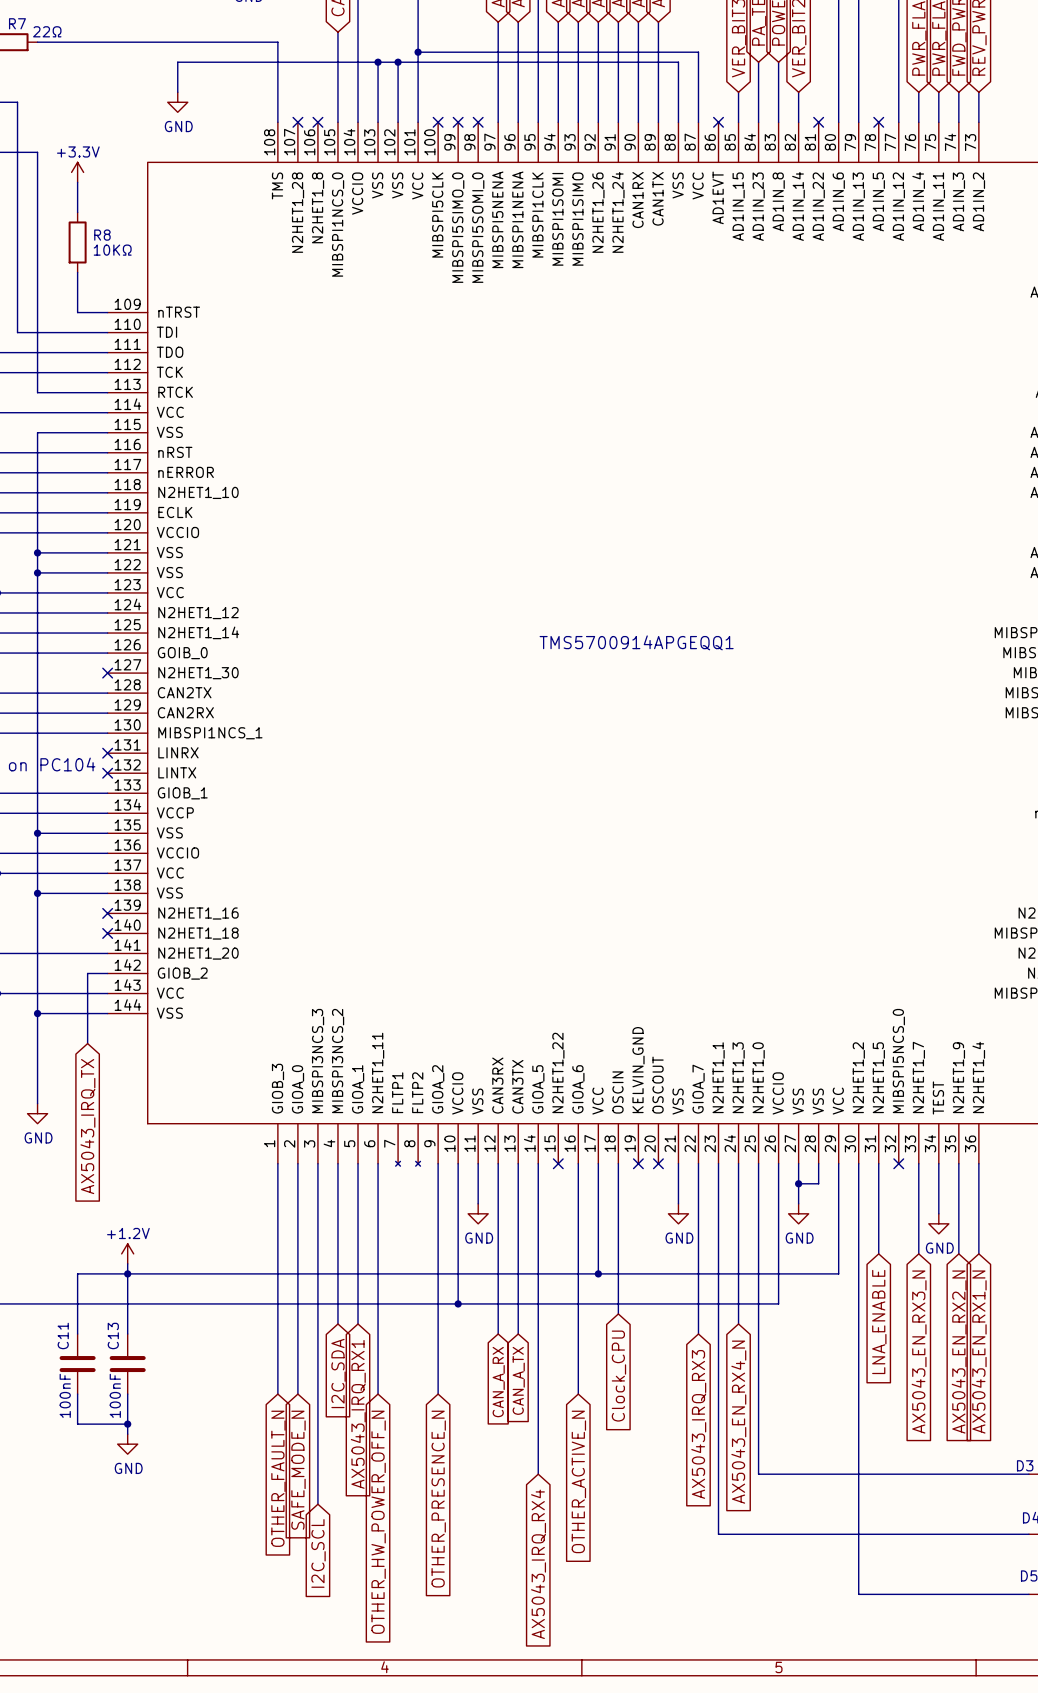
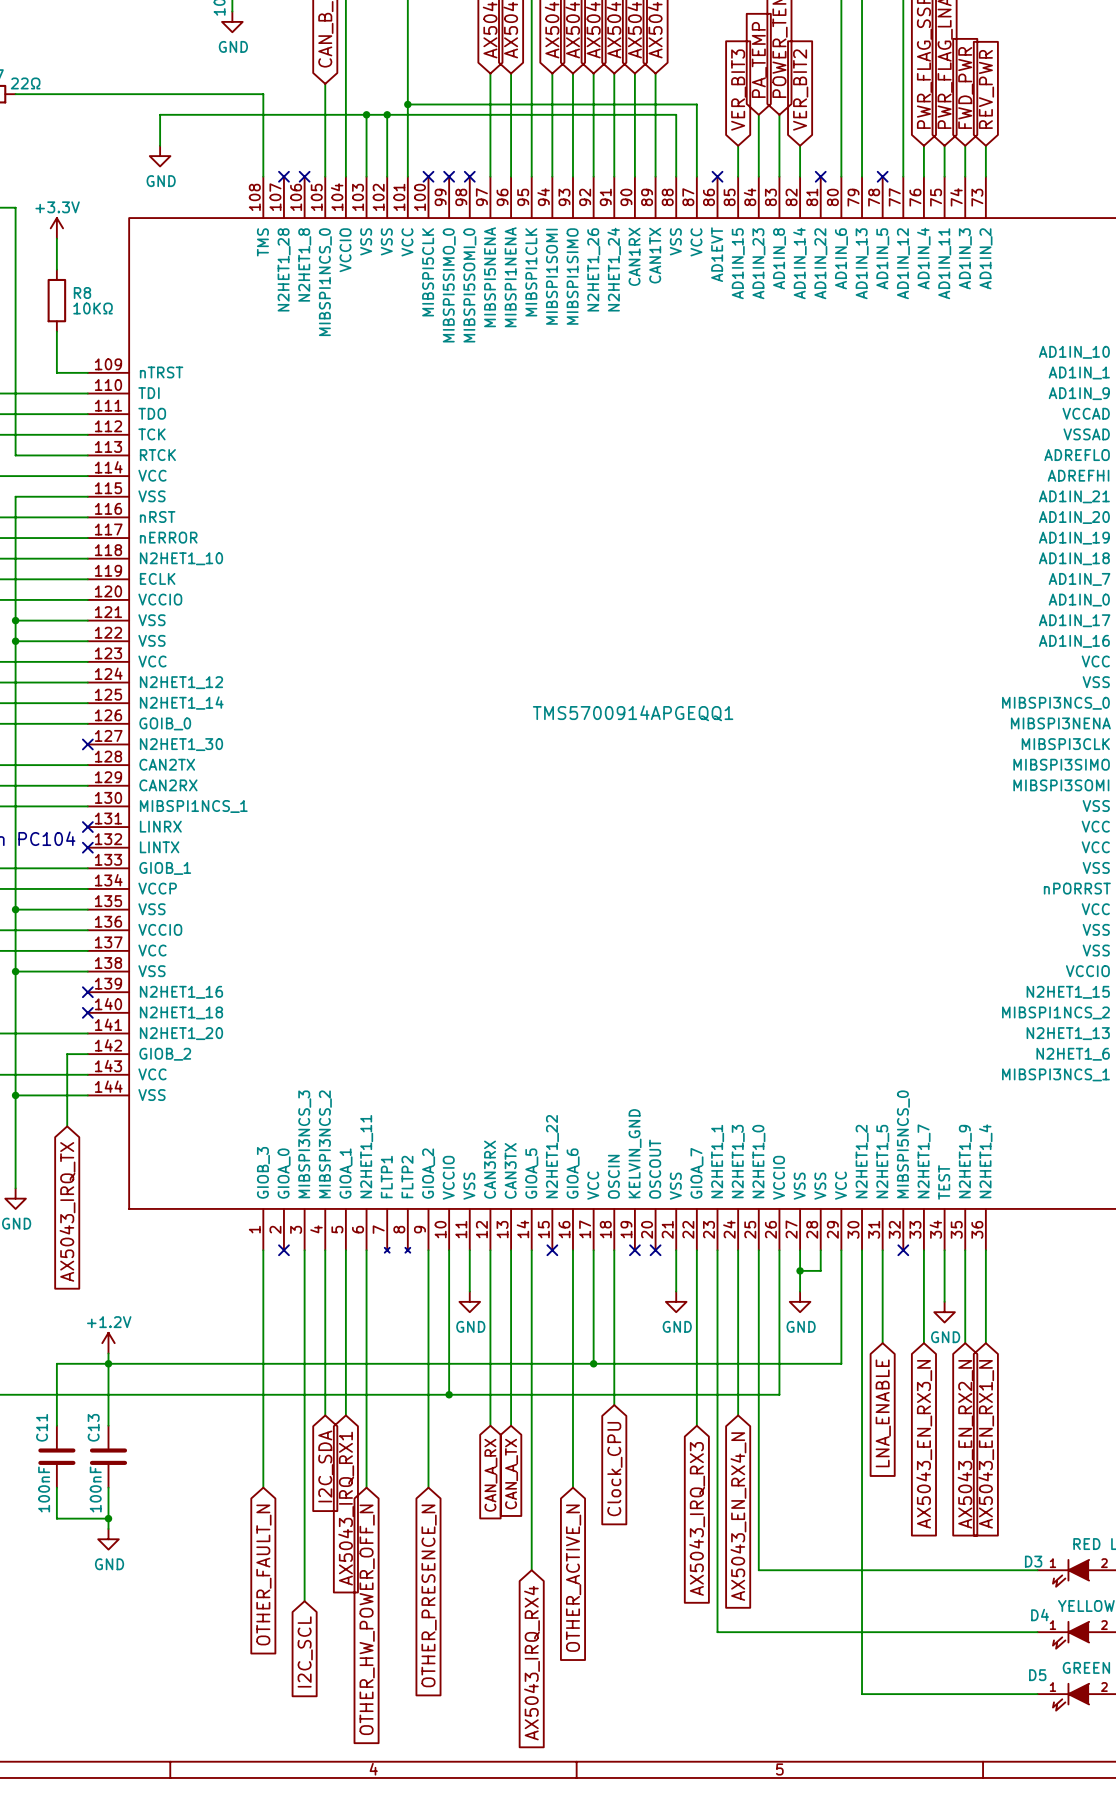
wire: (297, 1163) (297, 1394) -> none
no-connect mark: none -> (283, 1250)
global label: SAFE_MODE_N (298, 1470) -> none

